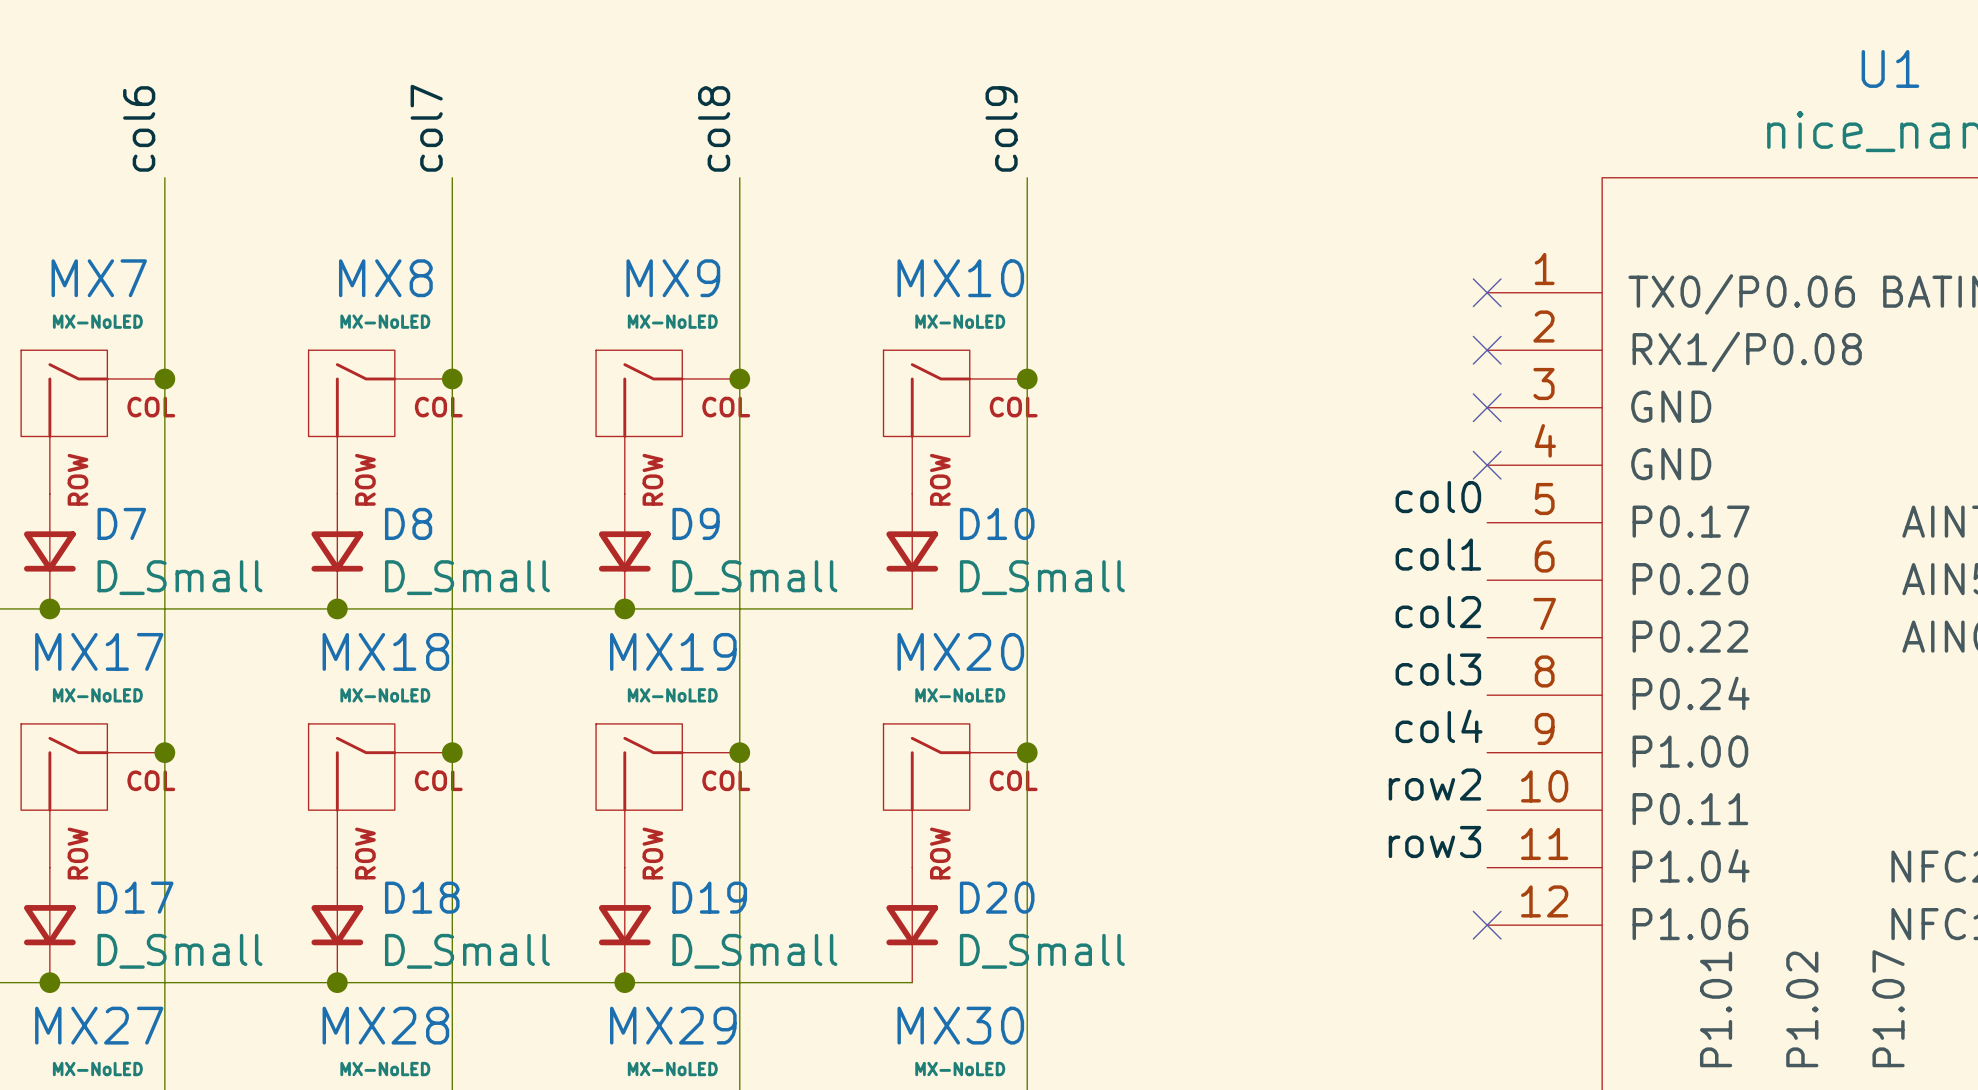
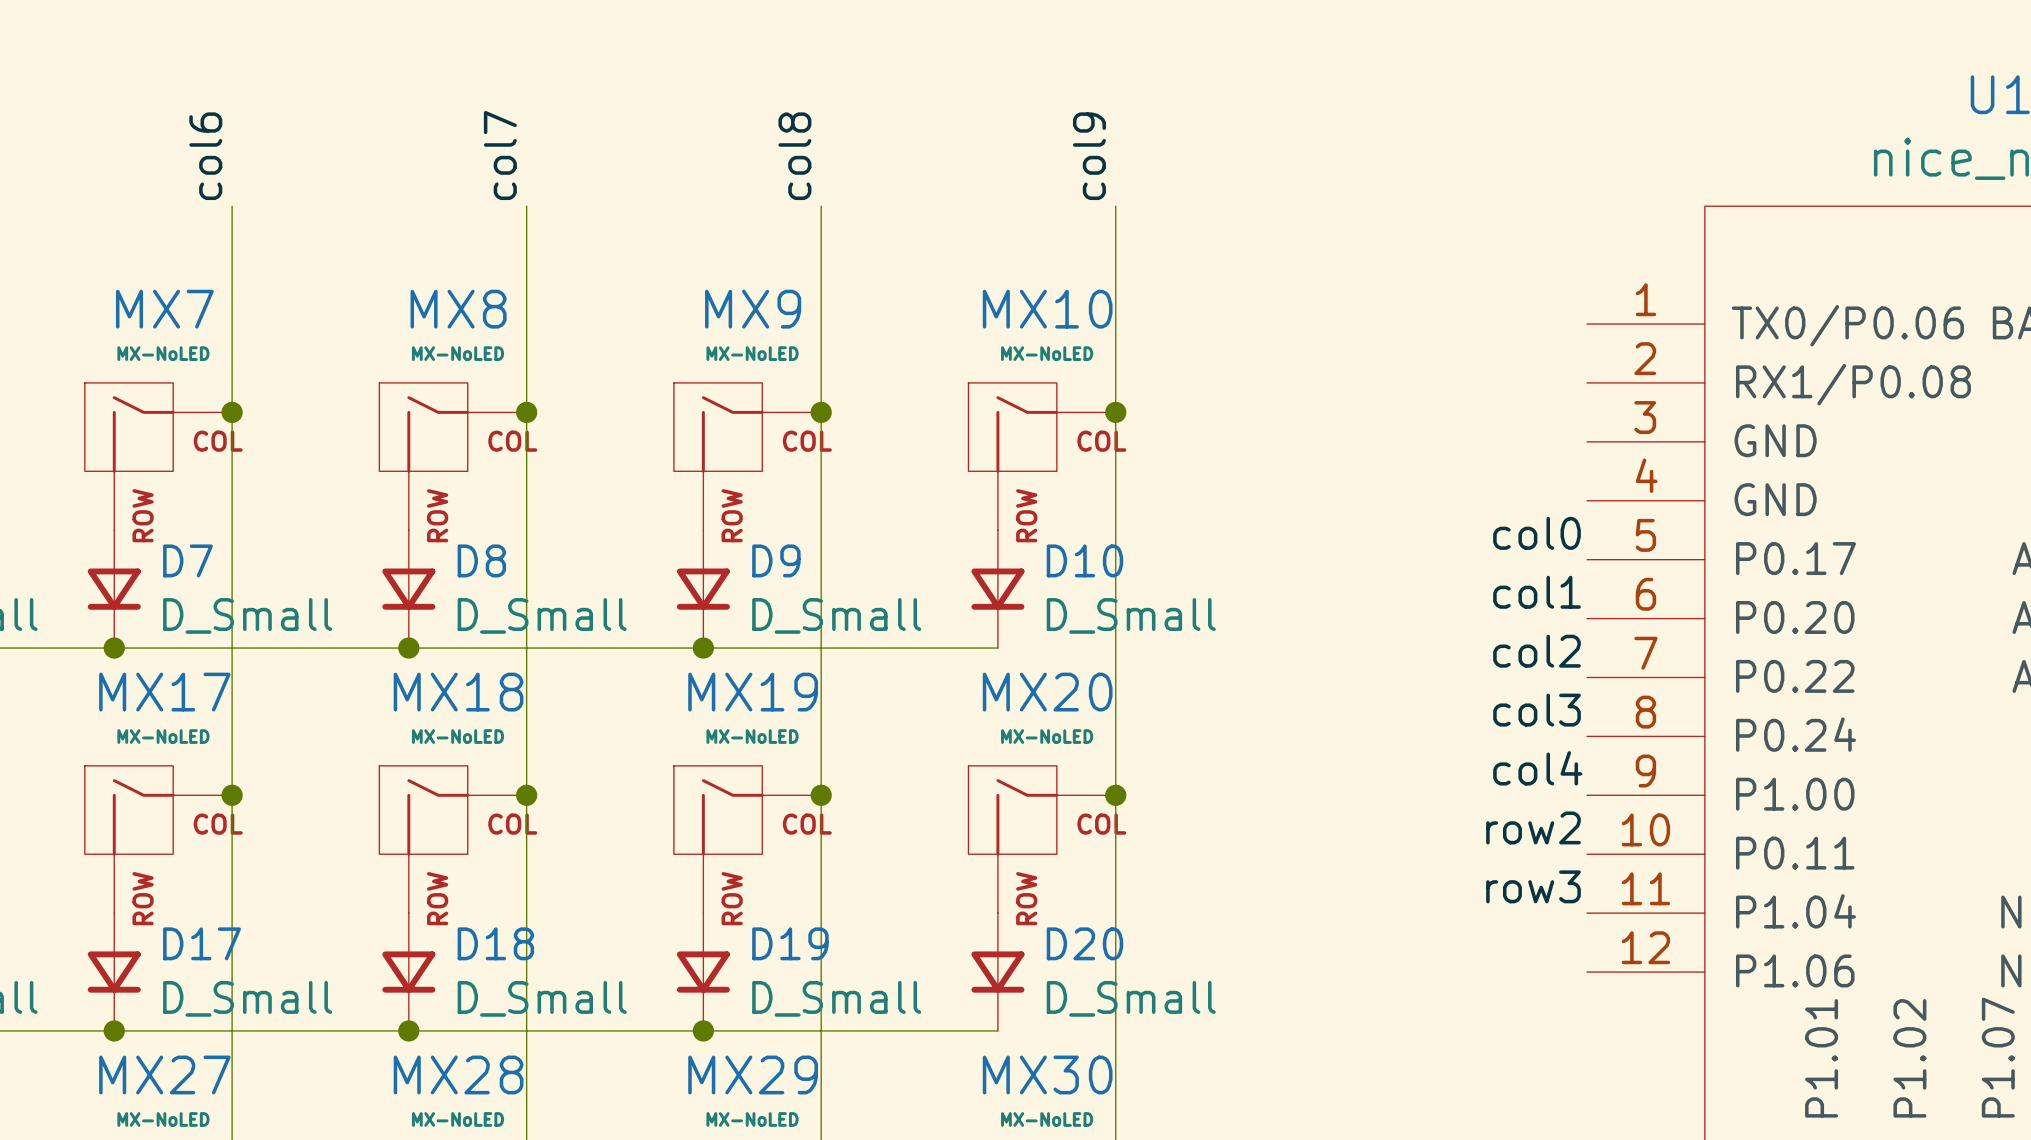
no-connect mark: (1487, 292) -> none
no-connect mark: (1487, 350) -> none
no-connect mark: (1487, 407) -> none
no-connect mark: (1487, 465) -> none
no-connect mark: (1487, 925) -> none

